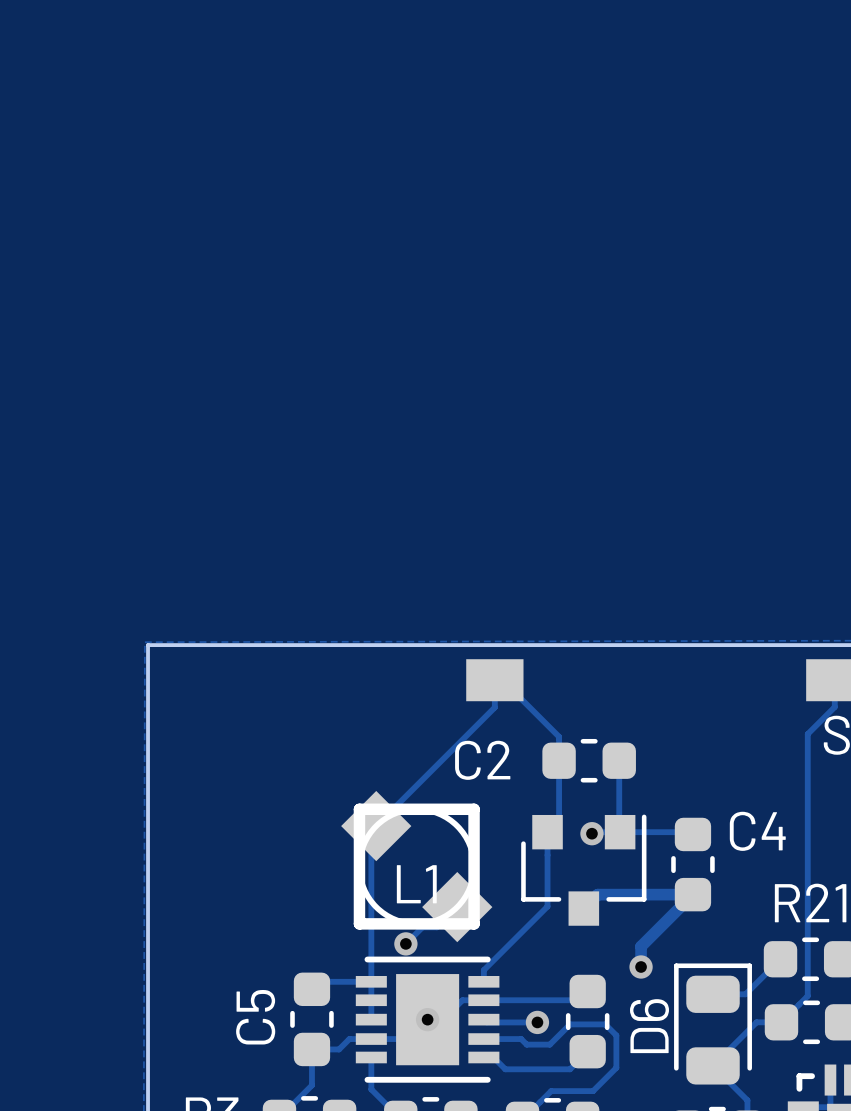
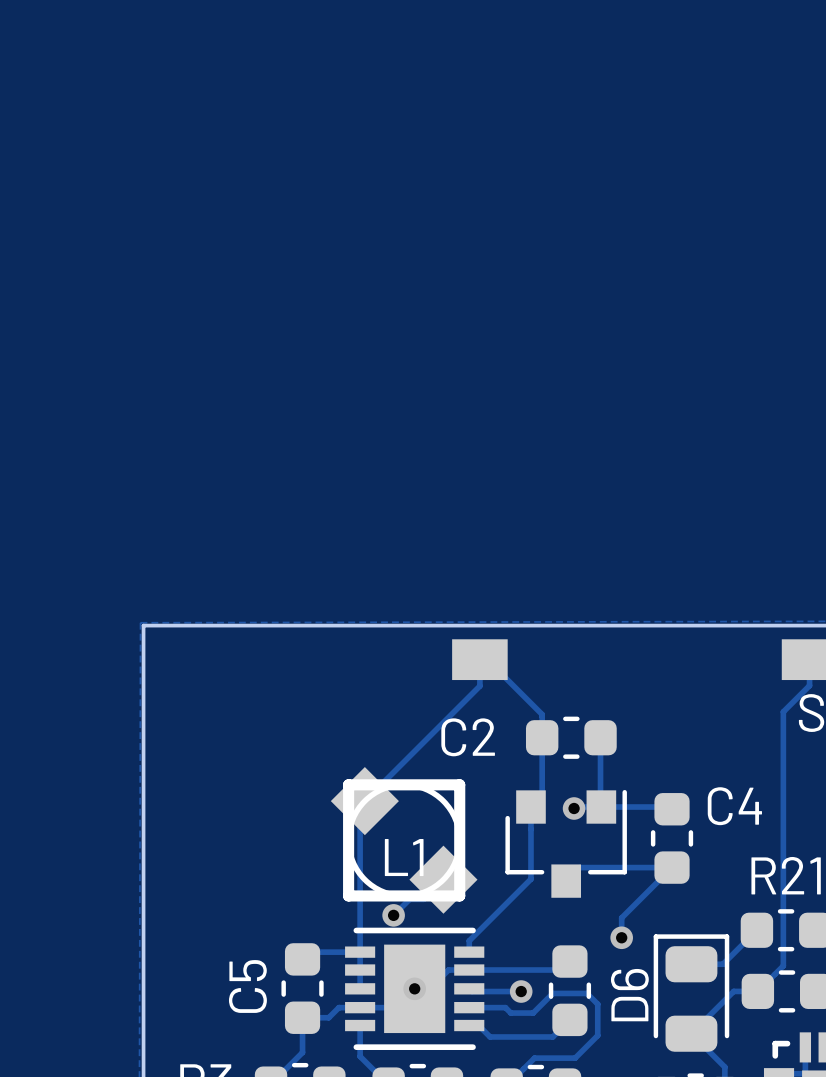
track width: thick (583, 908) (597, 894) (692, 894) (641, 946) (641, 966) -> thin (566, 881) (579, 867) (672, 867) (621, 917) (621, 937)

